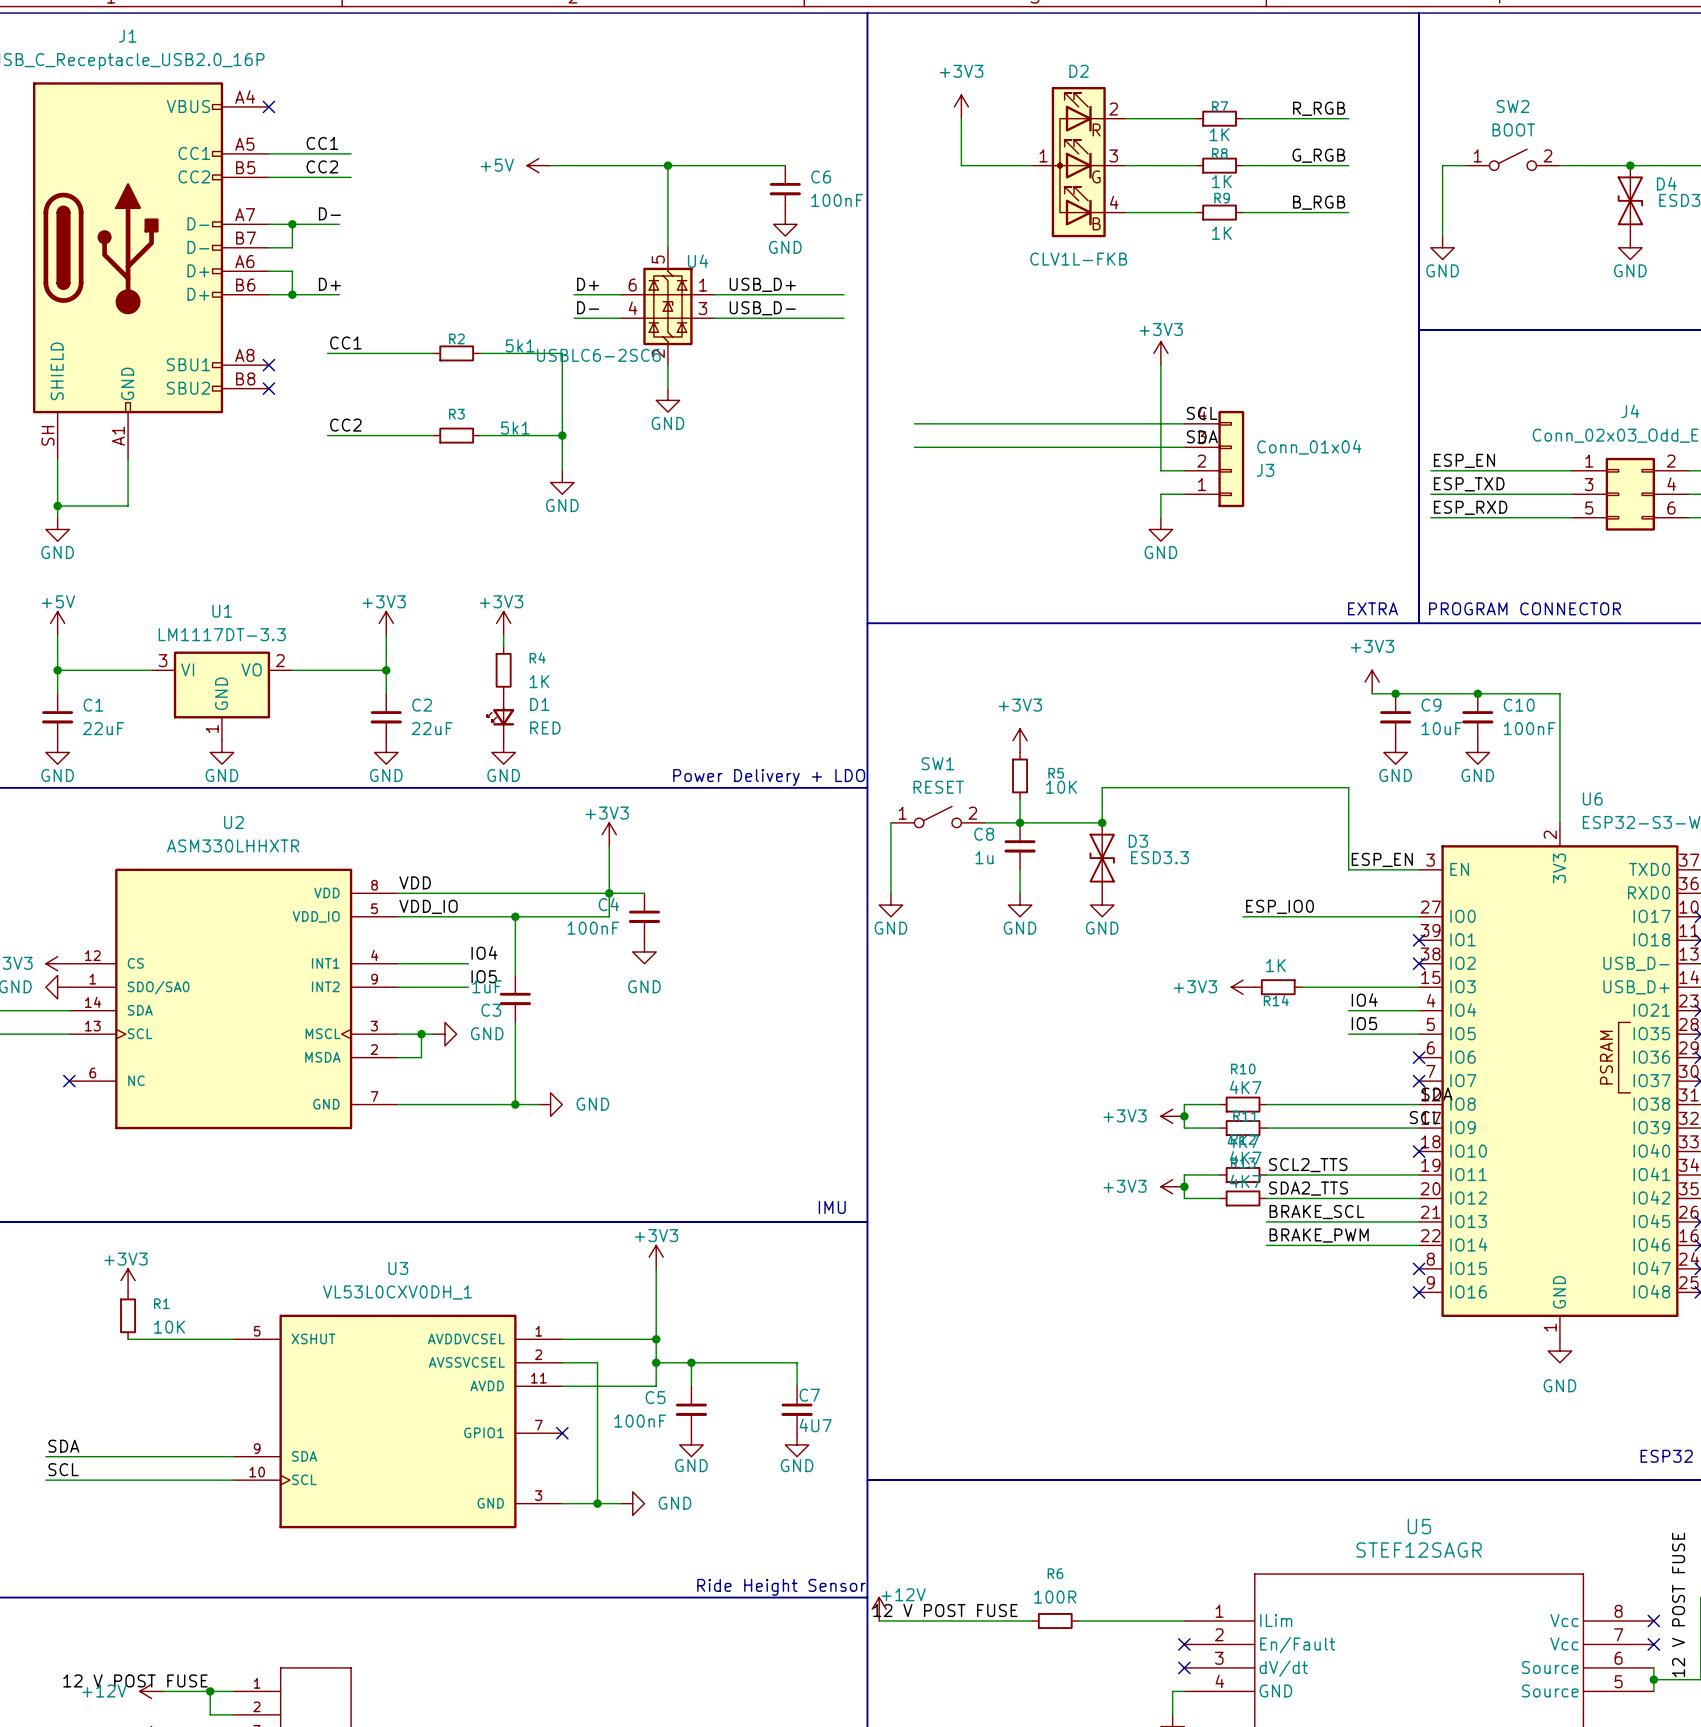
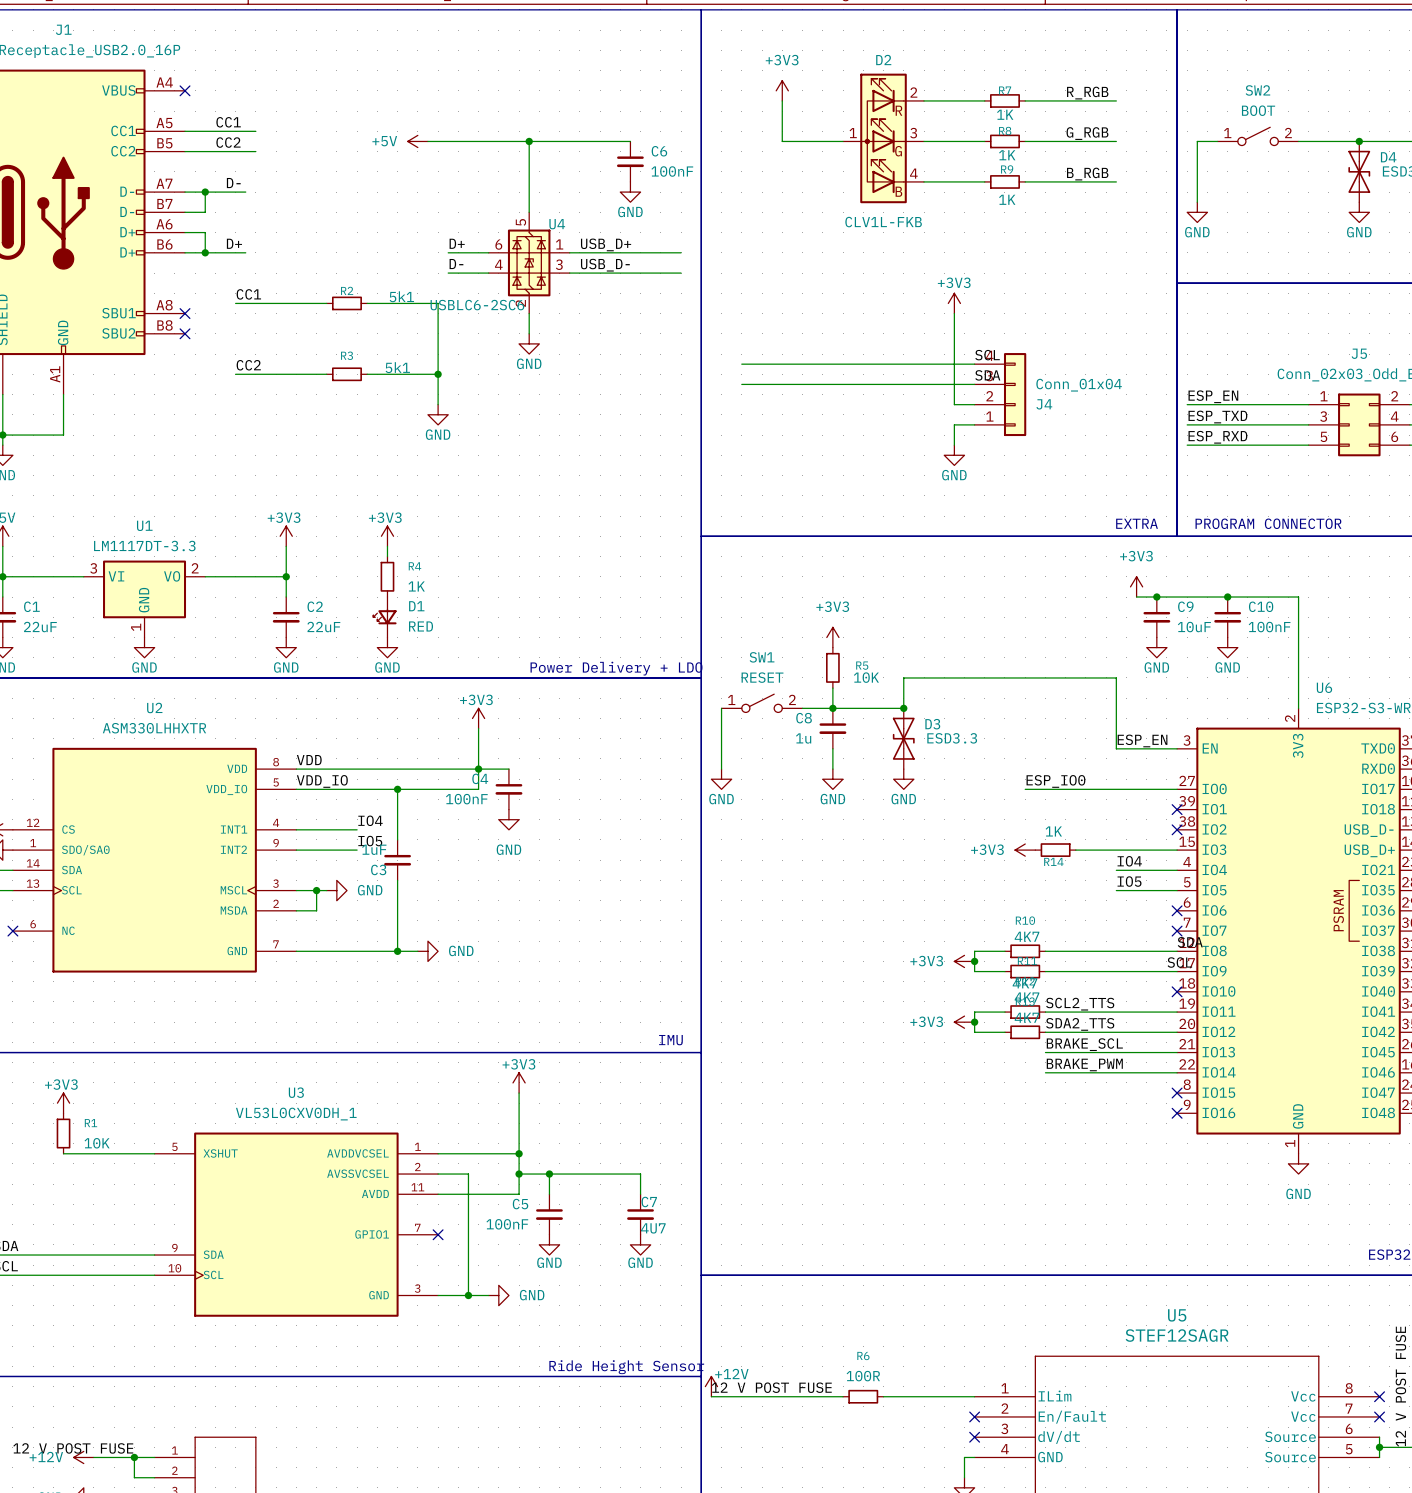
J4 name: J4 (1630, 411) -> J5 (1359, 353)
J3 name: J3 (1265, 470) -> J4 (1044, 404)

